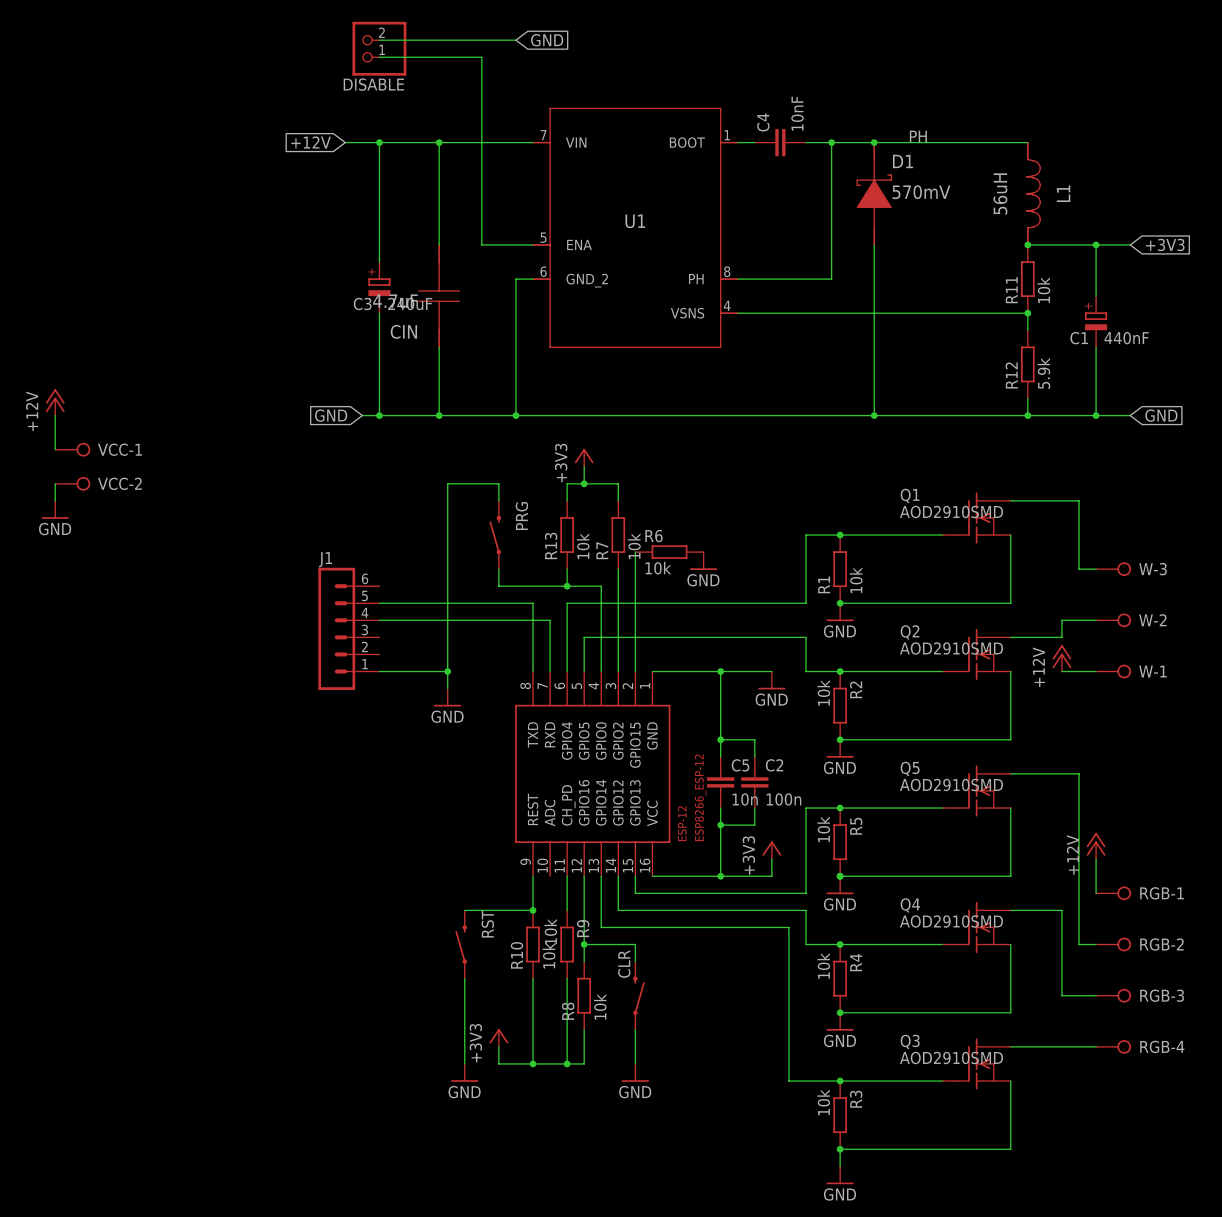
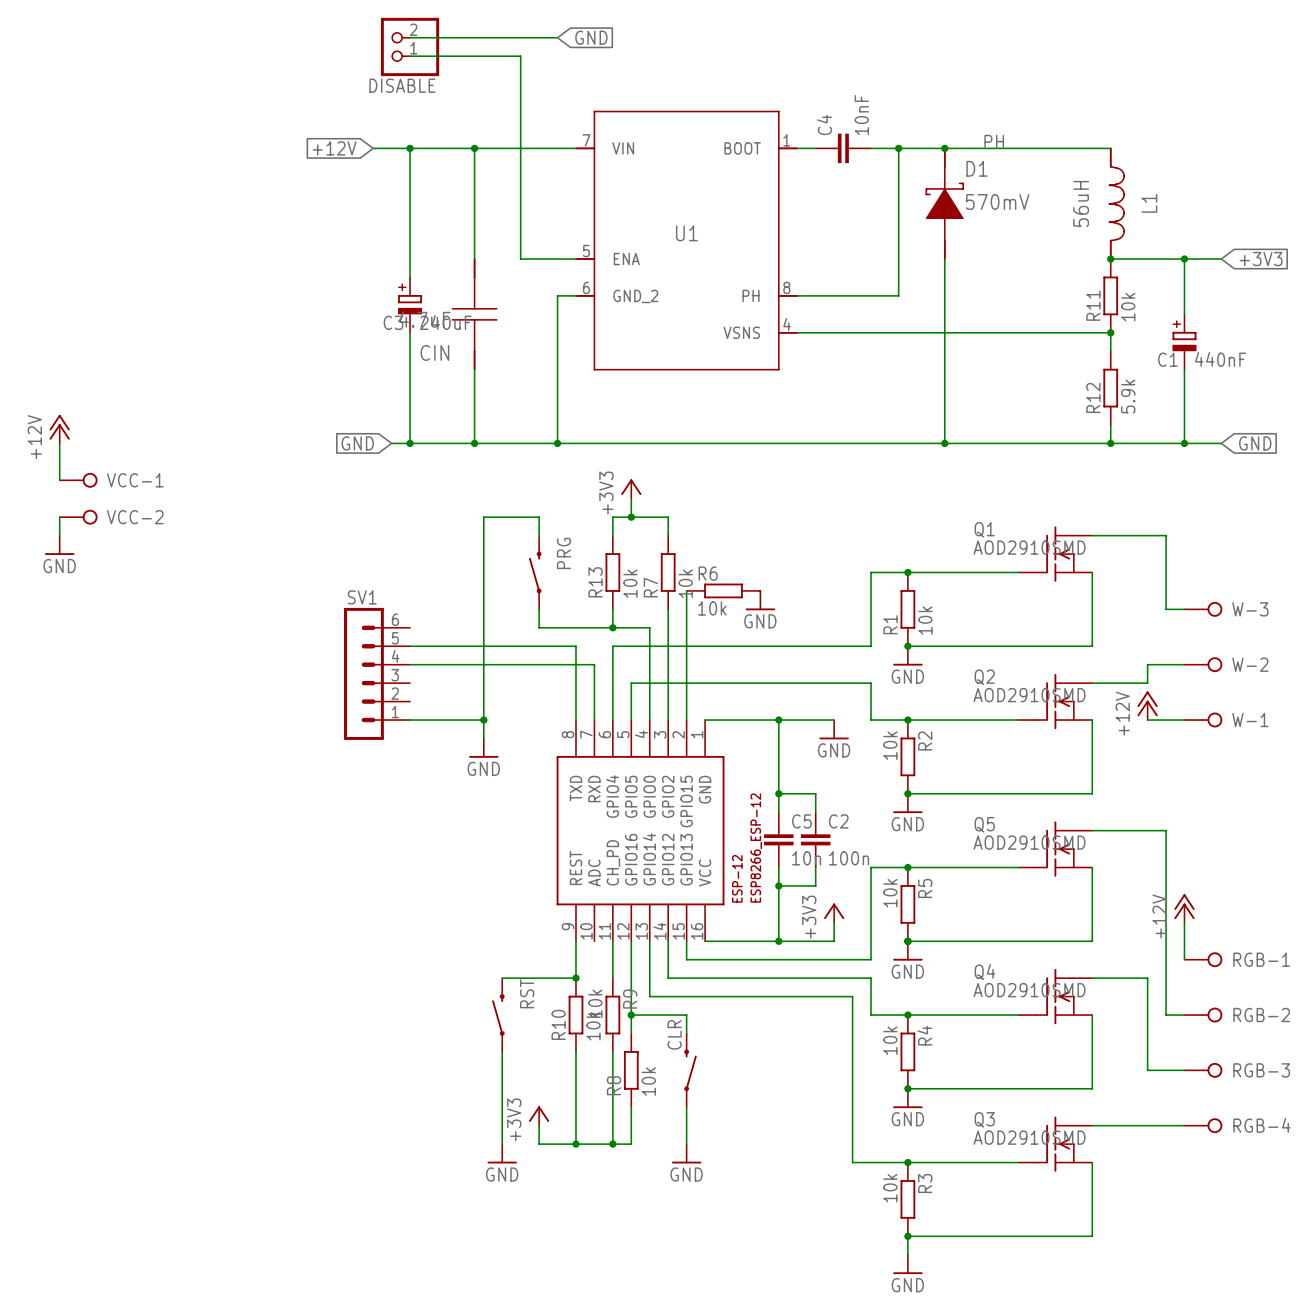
J1 name: J1 (325, 559) -> SV1 (362, 597)

